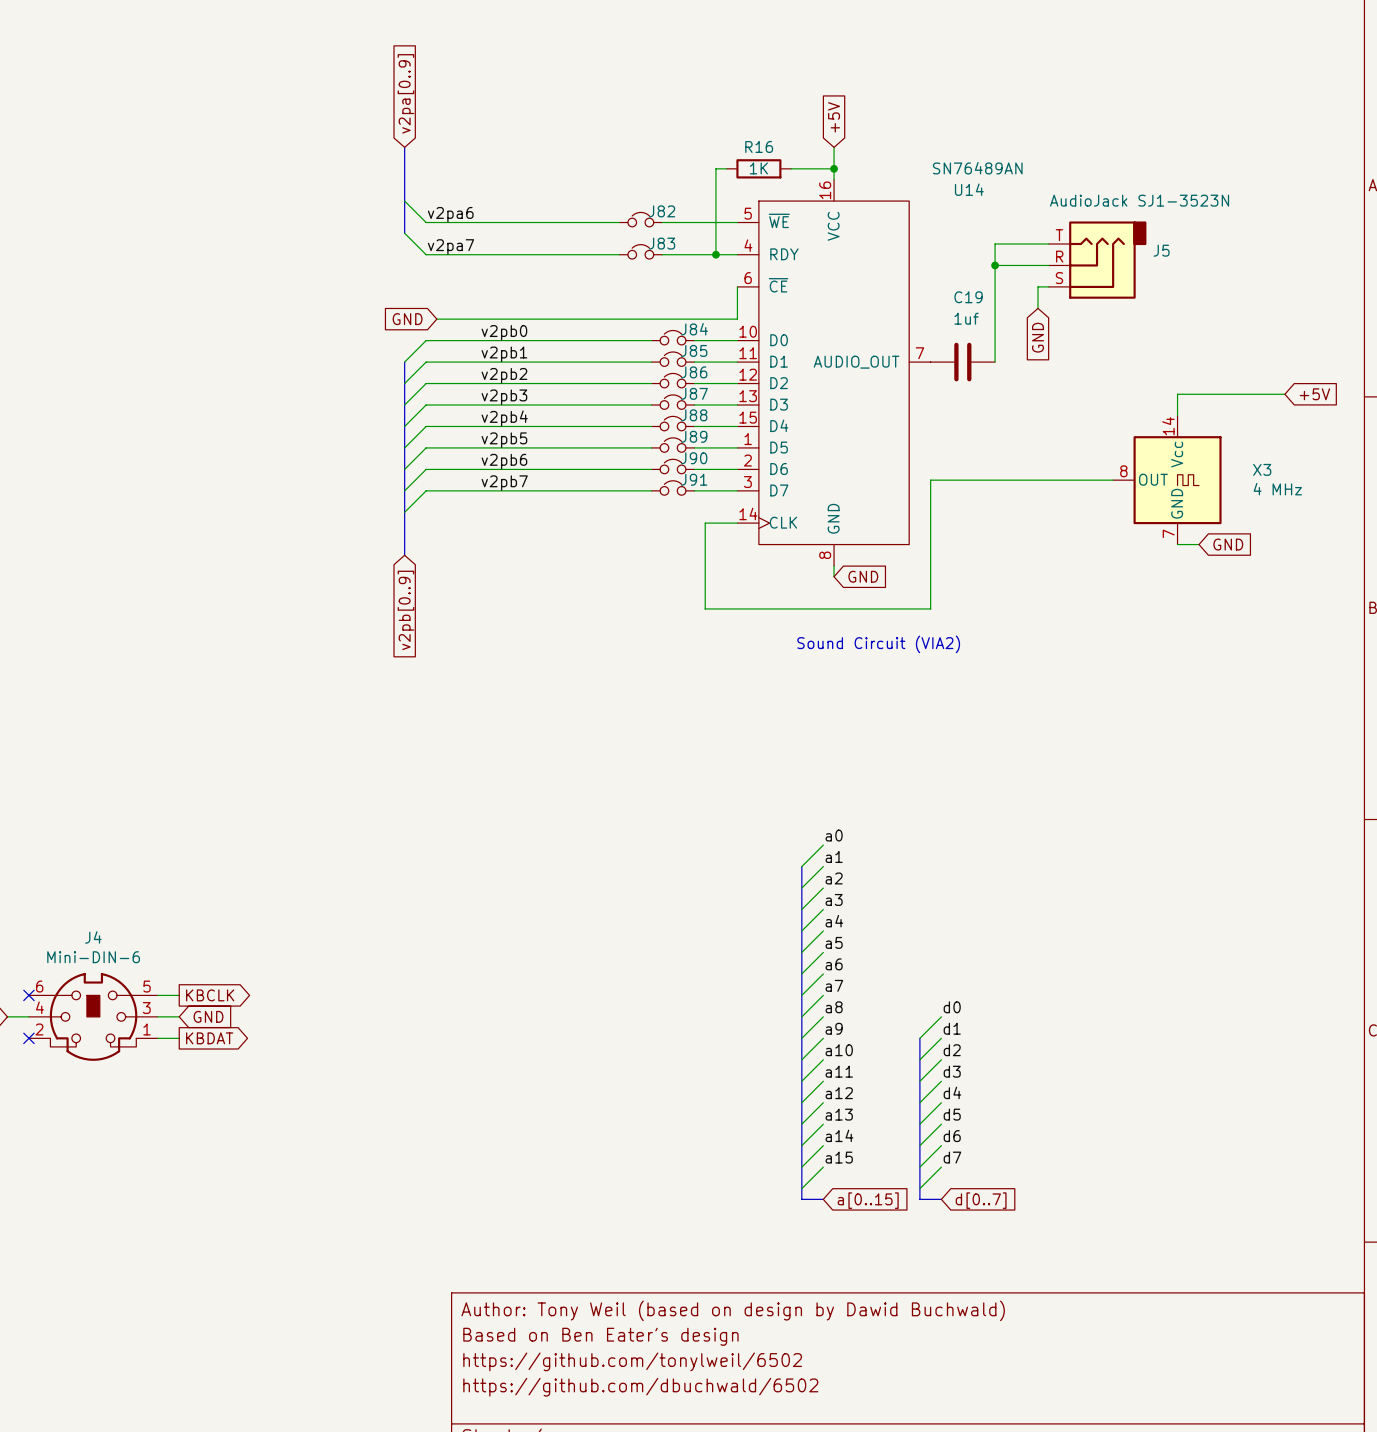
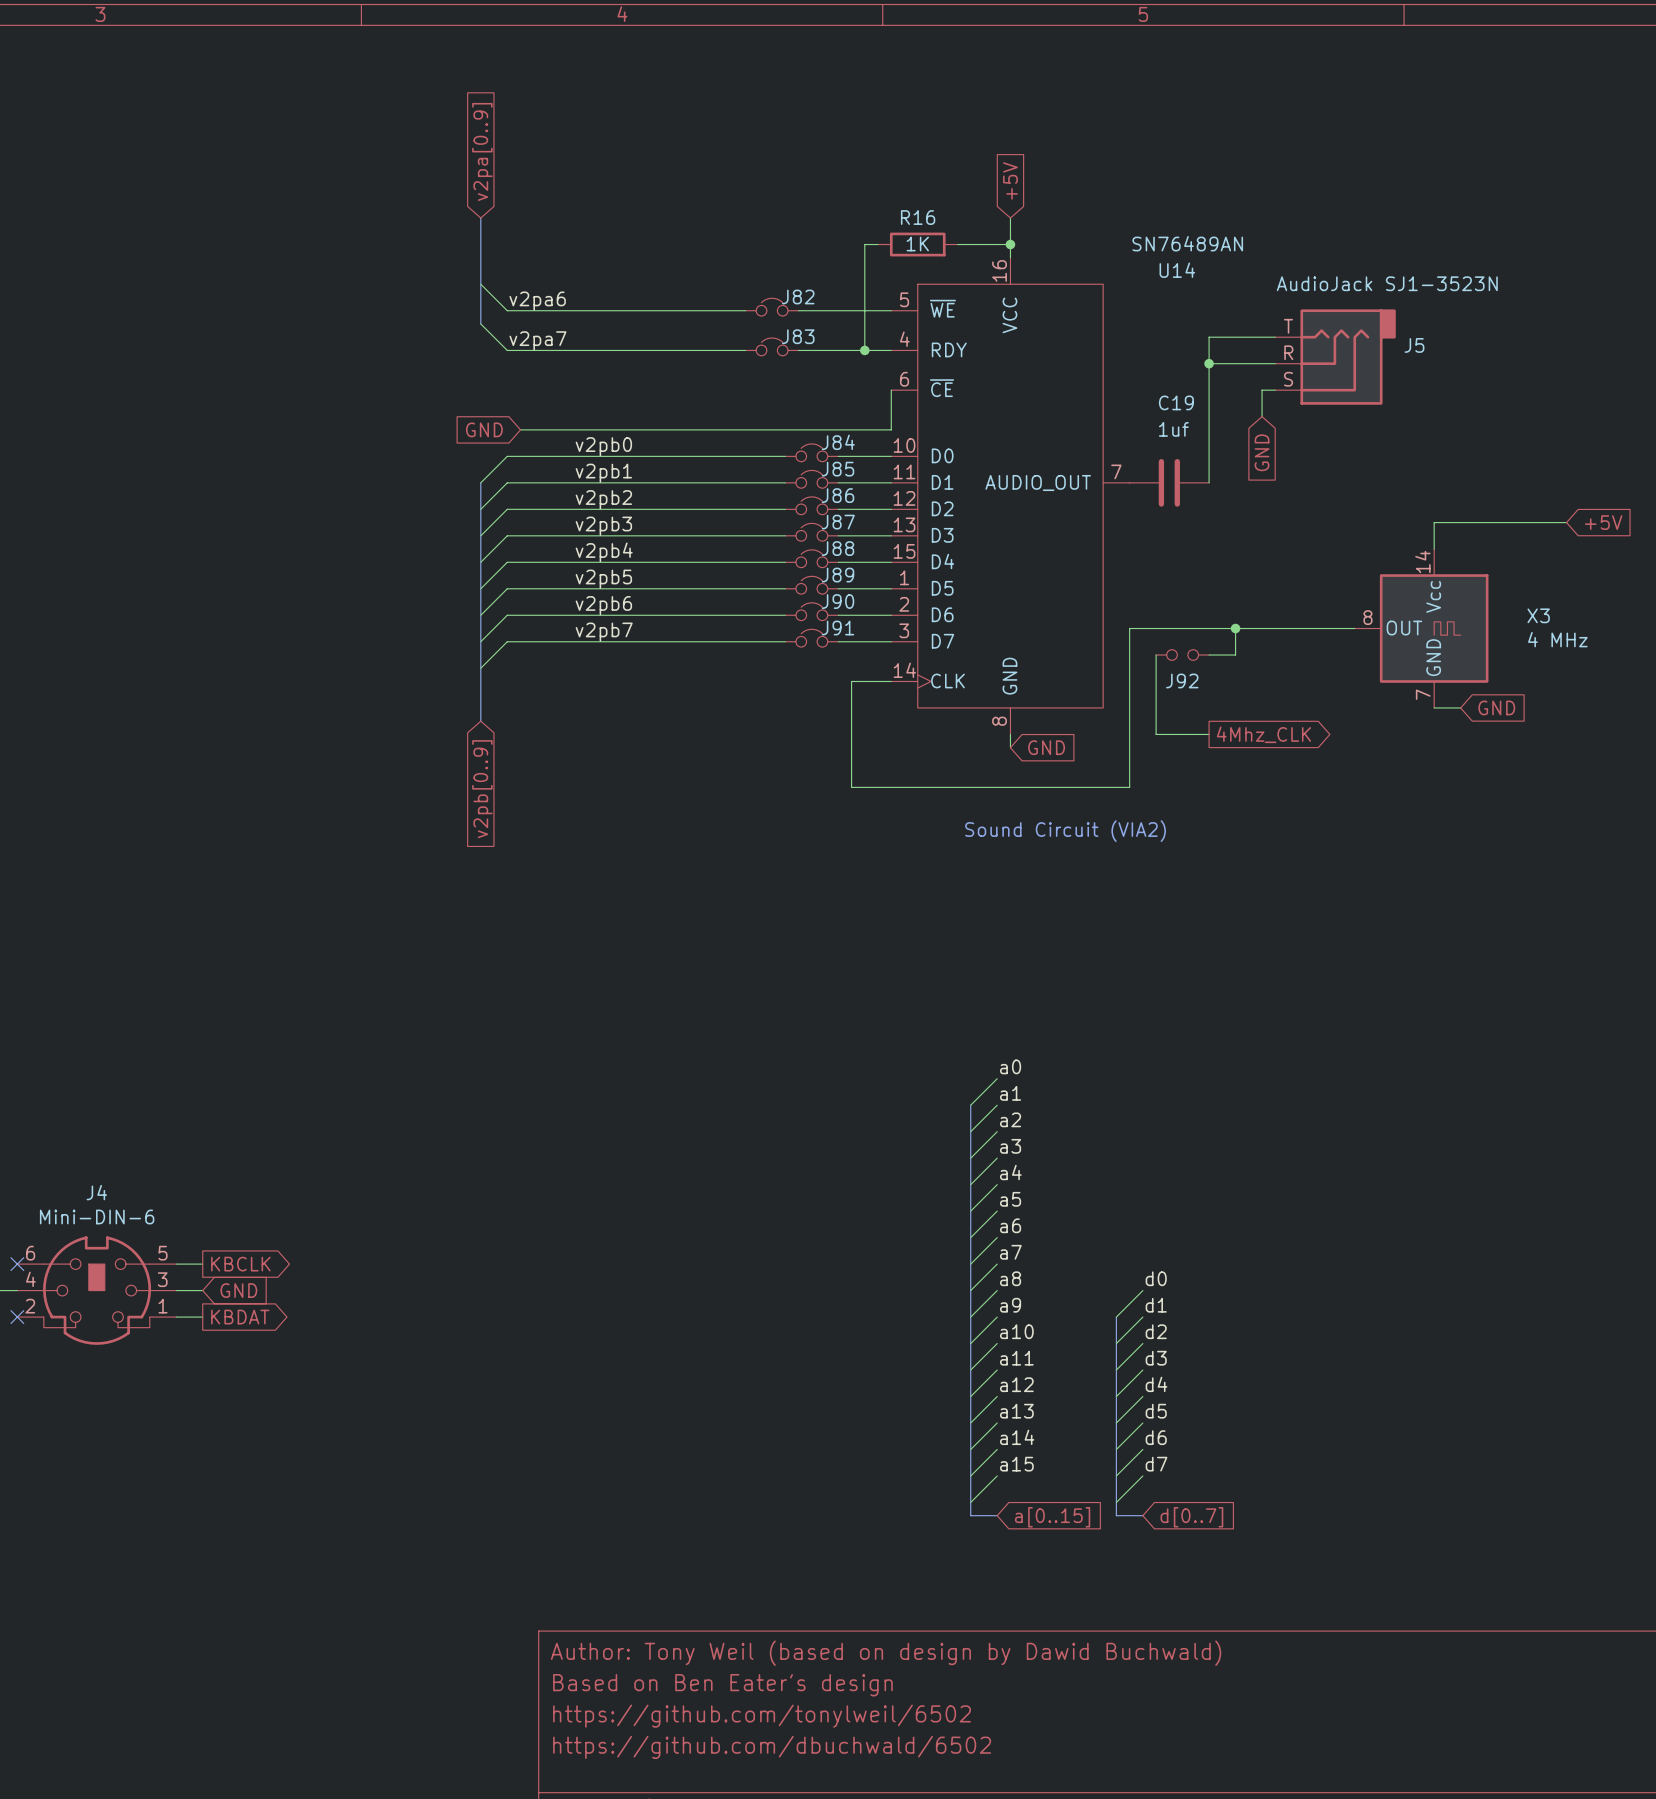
wire: none -> (1235, 628) (1235, 655) (1209, 655)
junction: none -> (1235, 628)
wire: none -> (1156, 655) (1156, 734) (1209, 734)
J92: none -> (1182, 655)
global label: none -> 4Mhz_CLK (1263, 734)

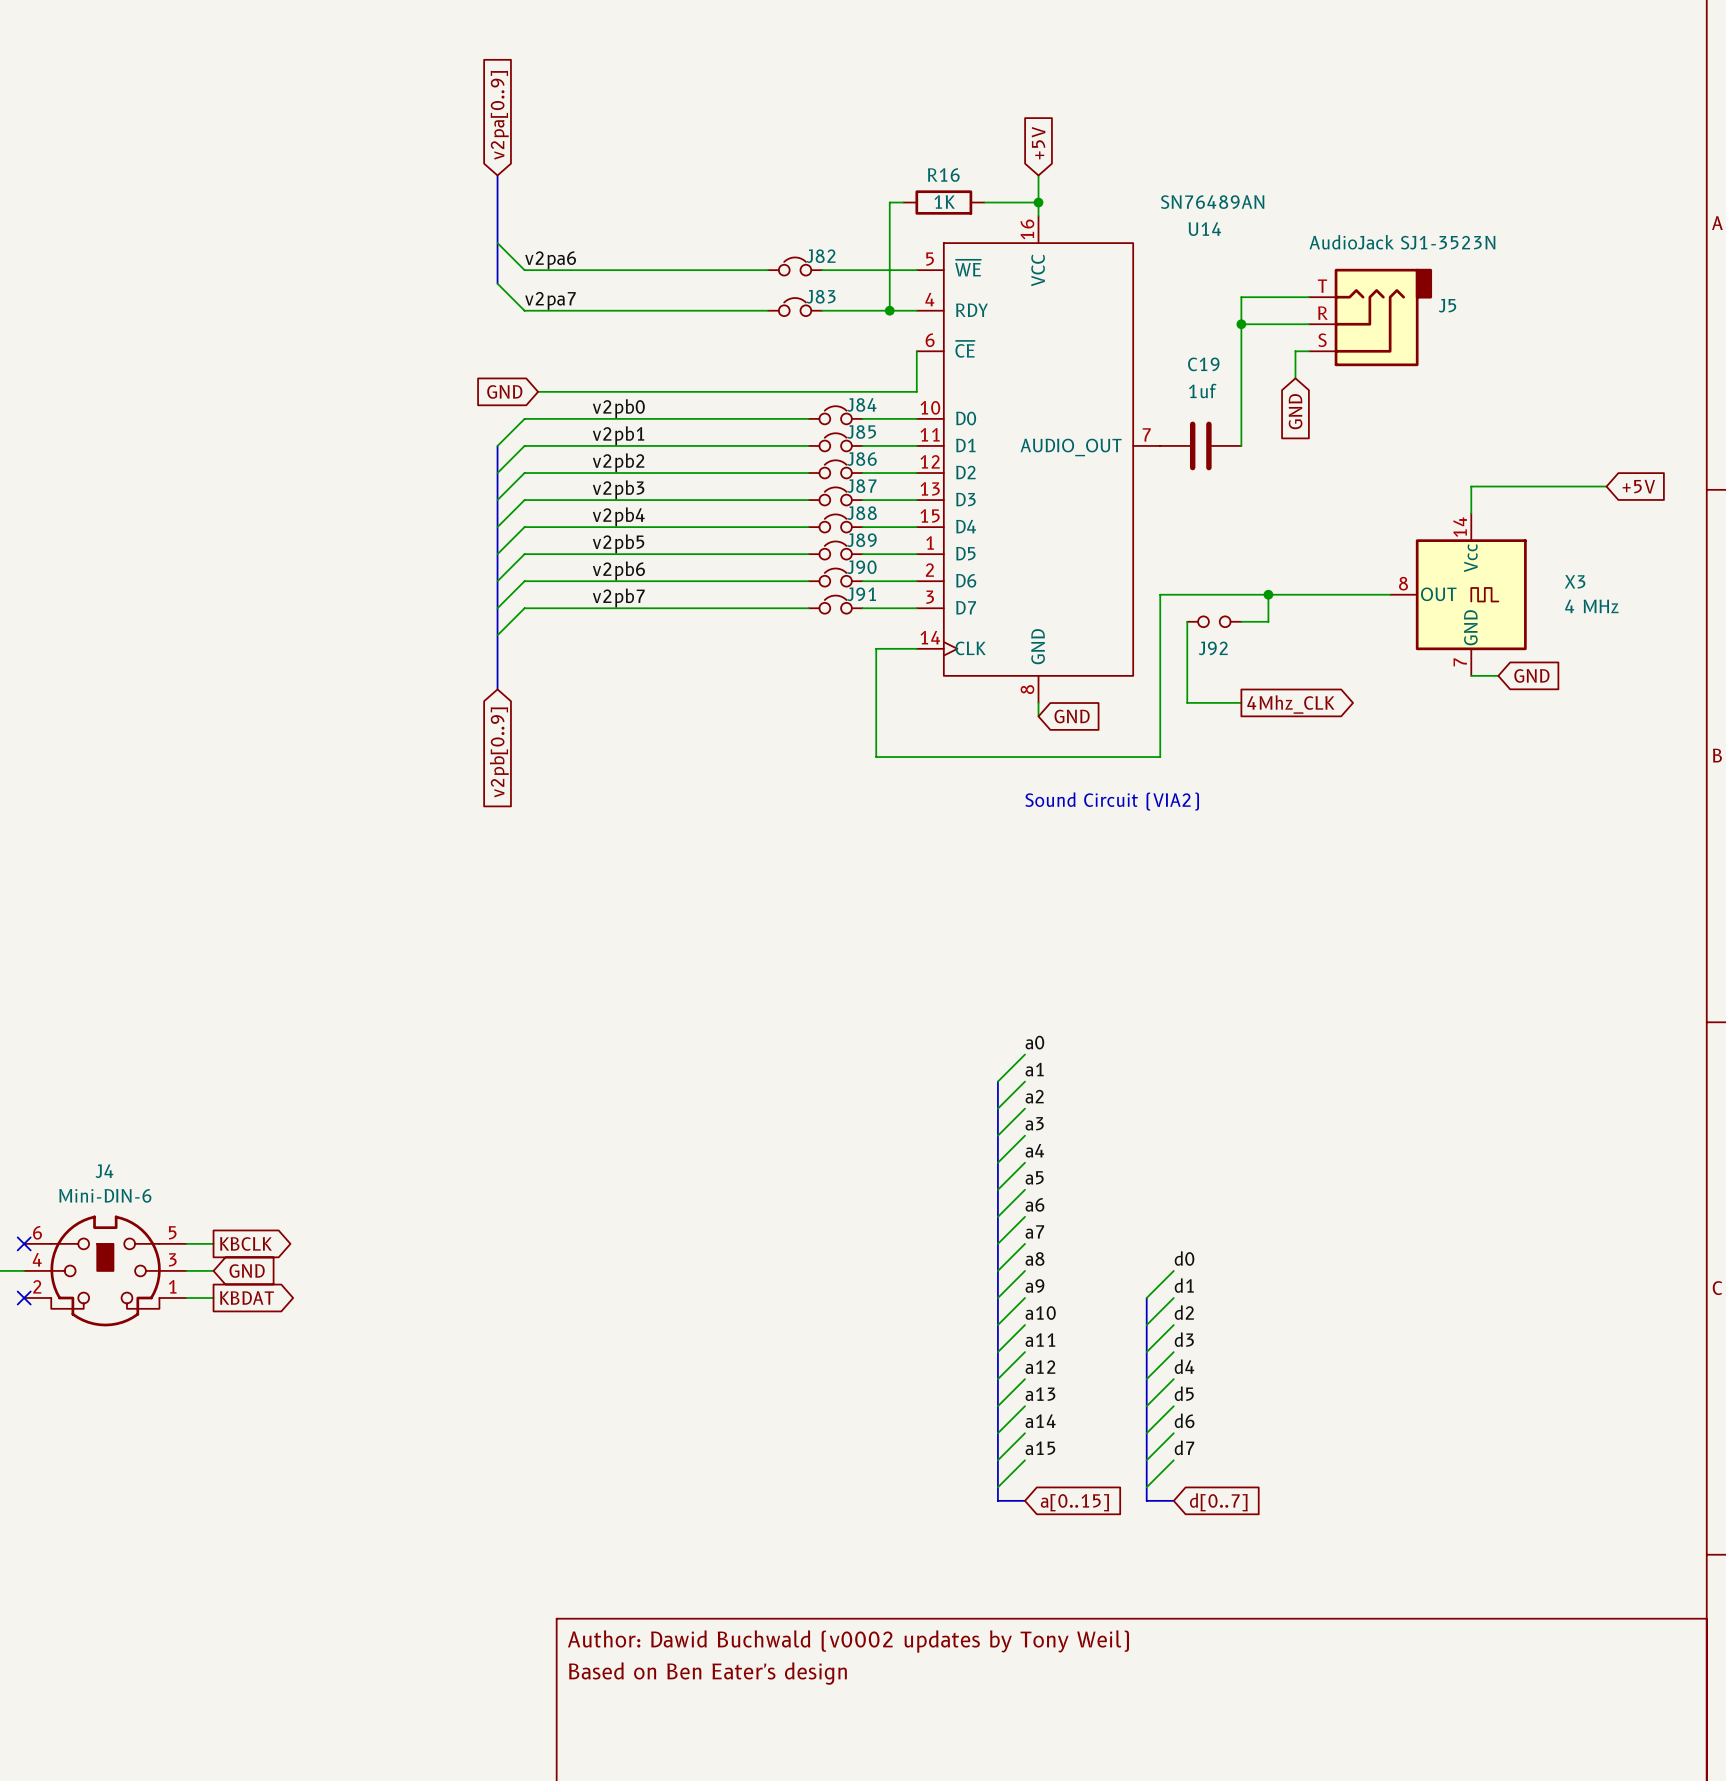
title block: Author: Tony Weil (based on design by Dawid Buchwald) (886, 1653) -> Author: Dawid Buchwald (v0002 updates by Tony Weil) (848, 1641)
title block: https://github.com/tonylweil/6502 (762, 1716) -> none
title block: https://github.com/dbuchwald/6502 (772, 1747) -> none

